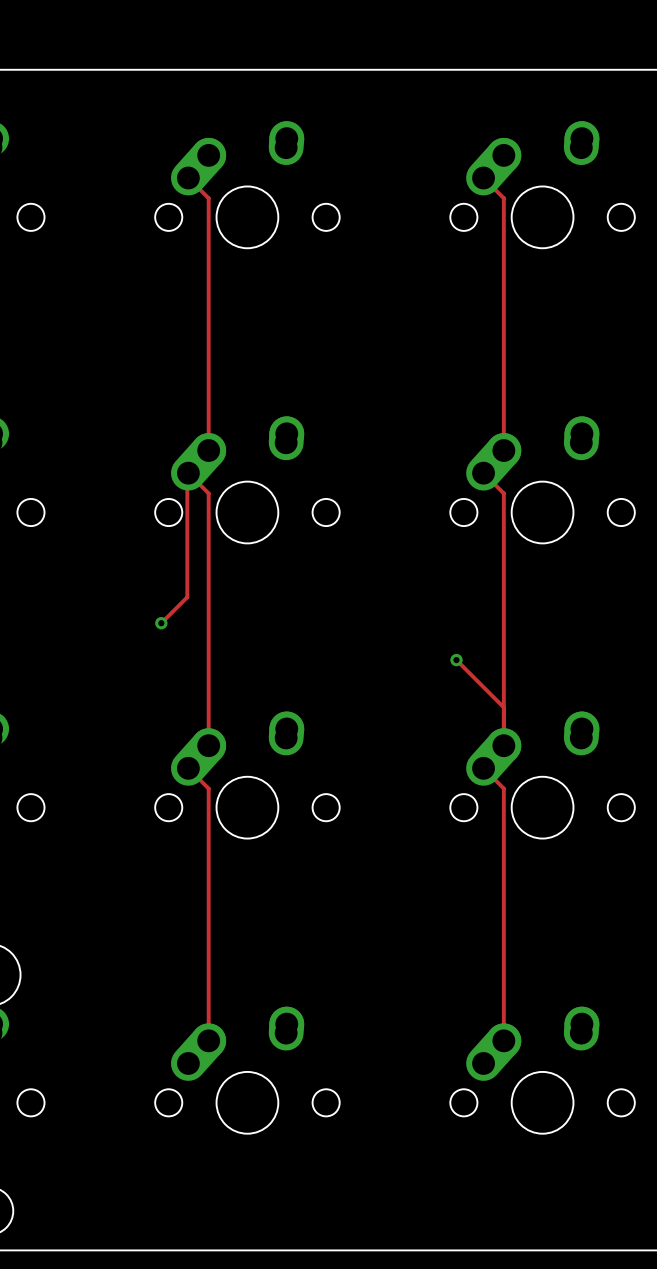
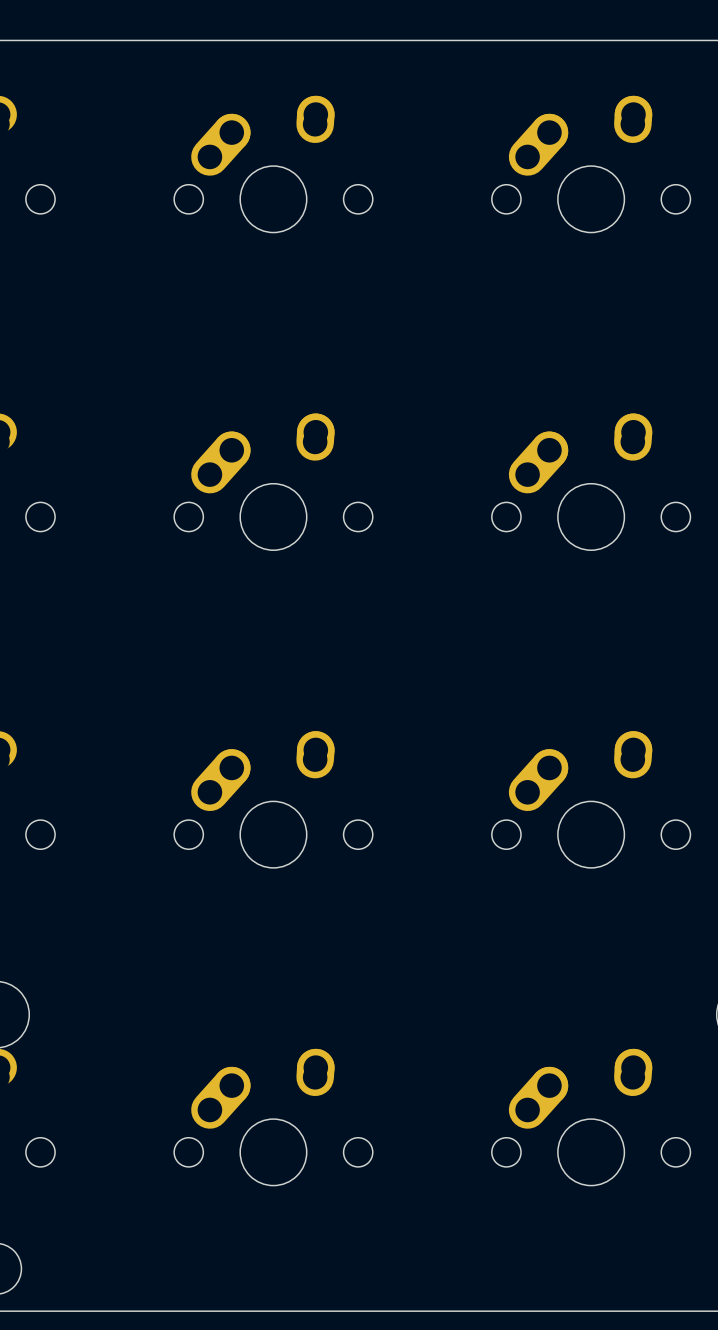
track: (188, 178) (208, 198) (208, 450) -> none
track: (483, 178) (503, 198) (503, 450) -> none
track: (483, 473) (503, 493) (503, 748) (483, 768) (503, 788) (503, 1040) -> none
track: (161, 623) (187, 597) (188, 473) (208, 493) (208, 745) -> none
via: (161, 623) -> none
track: (456, 660) (503, 707) -> none
via: (456, 660) -> none
track: (188, 768) (208, 788) (208, 1040) -> none

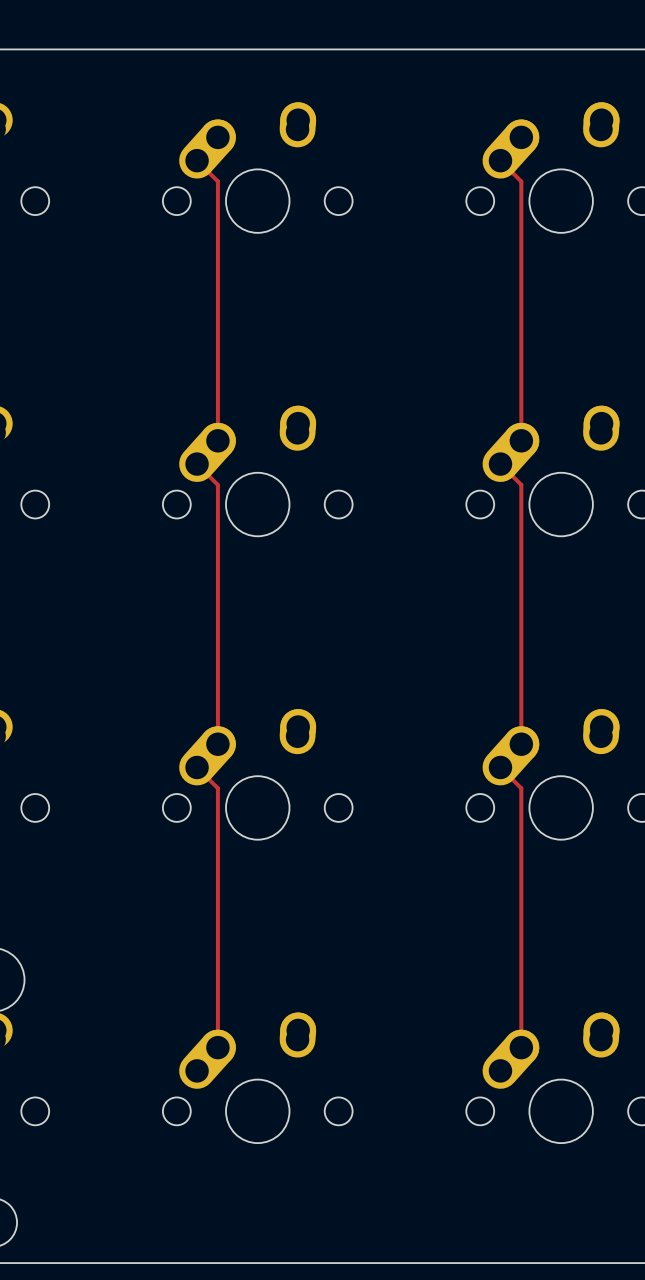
track: none -> (197, 160) (217, 181) (217, 443) (197, 464) (217, 484) (217, 744)
track: none -> (500, 160) (521, 181) (521, 440)
track: none -> (500, 464) (521, 484) (521, 746) (500, 767) (521, 788) (521, 1047)
track: none -> (197, 767) (217, 788) (217, 1047)

